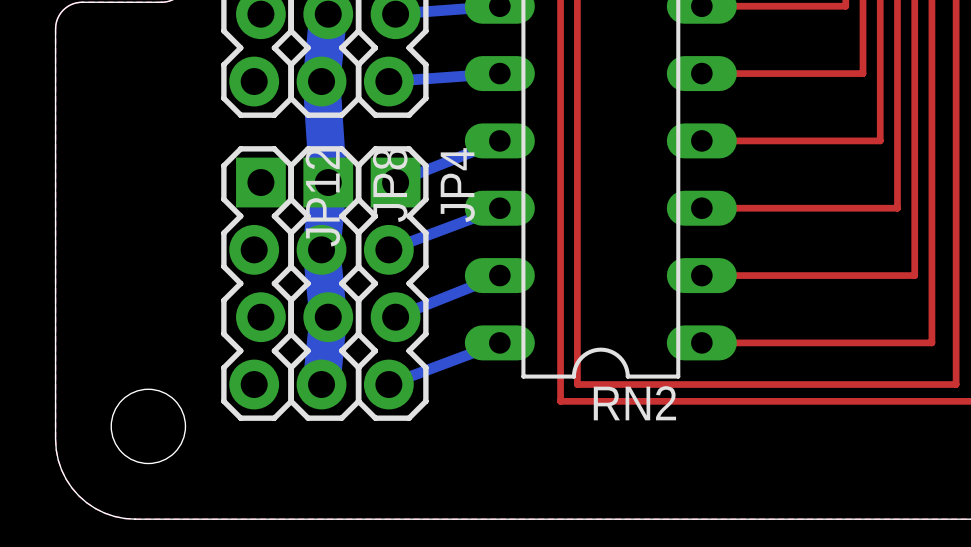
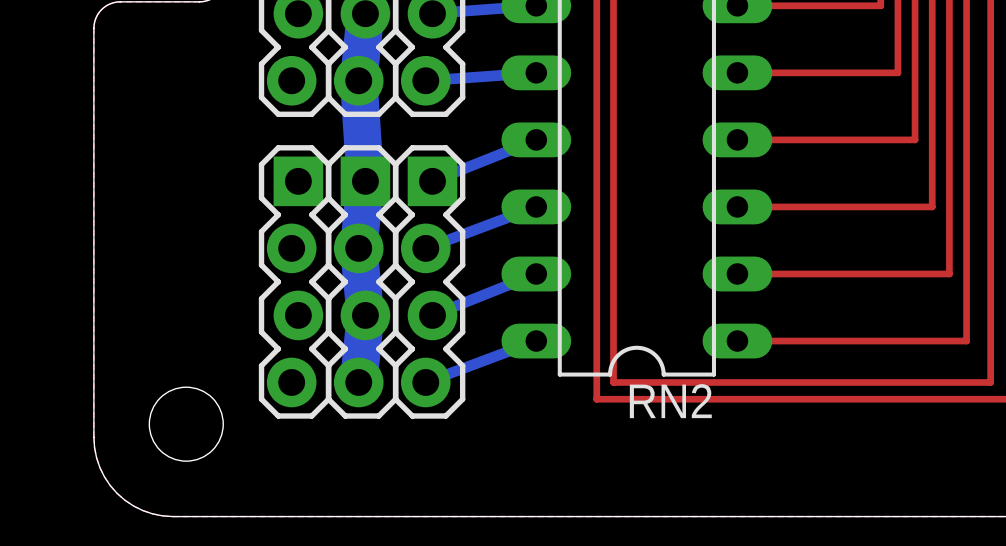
JP8 name: JP8 (390, 185) -> none
JP4 name: JP4 (457, 185) -> none
JP12 name: JP12 (322, 197) -> none

